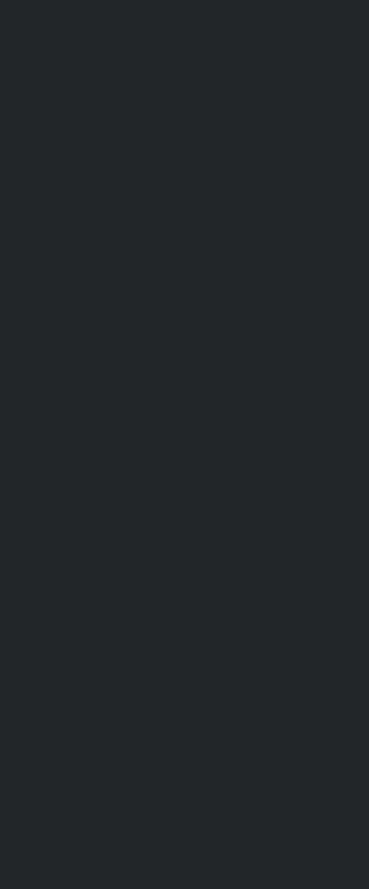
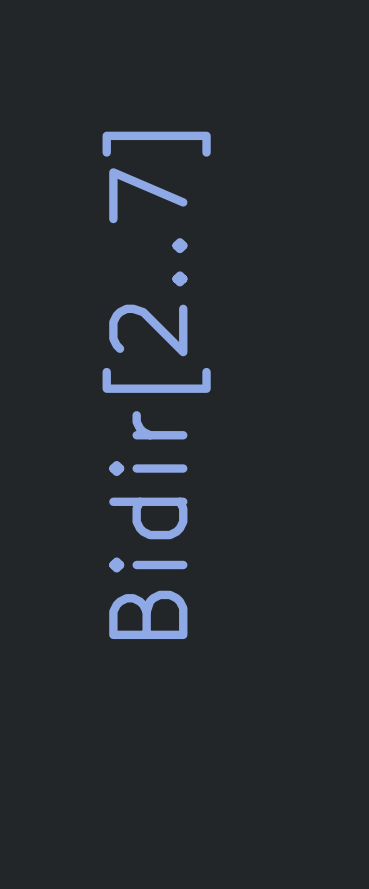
text: none -> Bidir[2..7] (156, 385)

